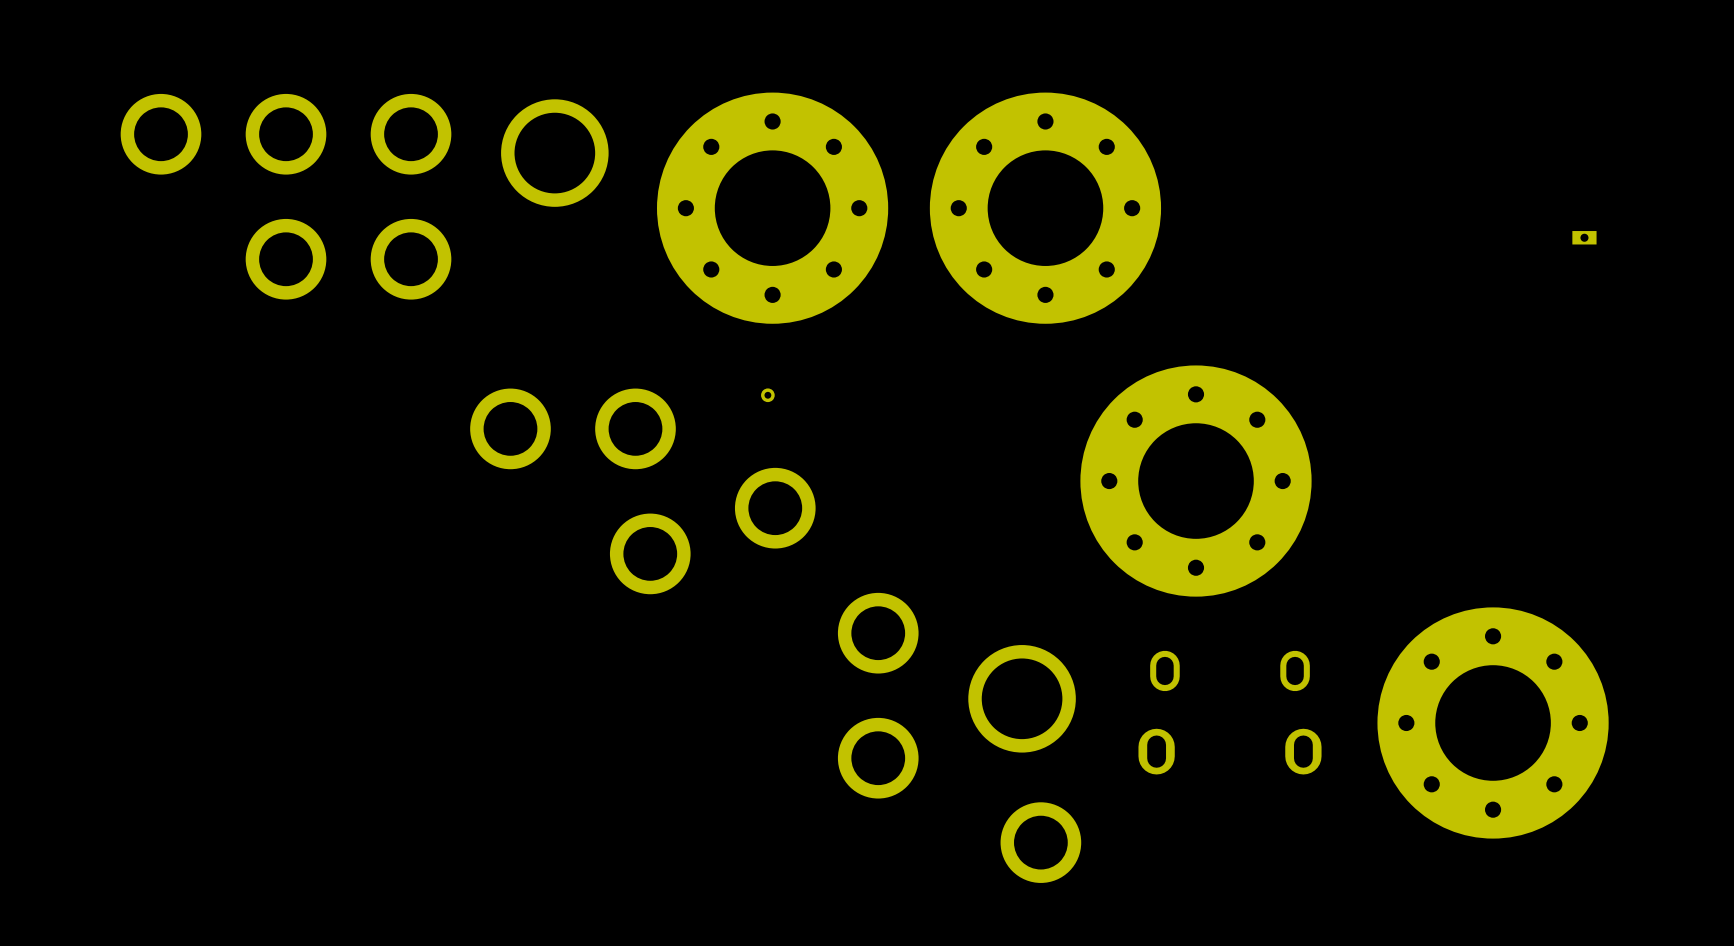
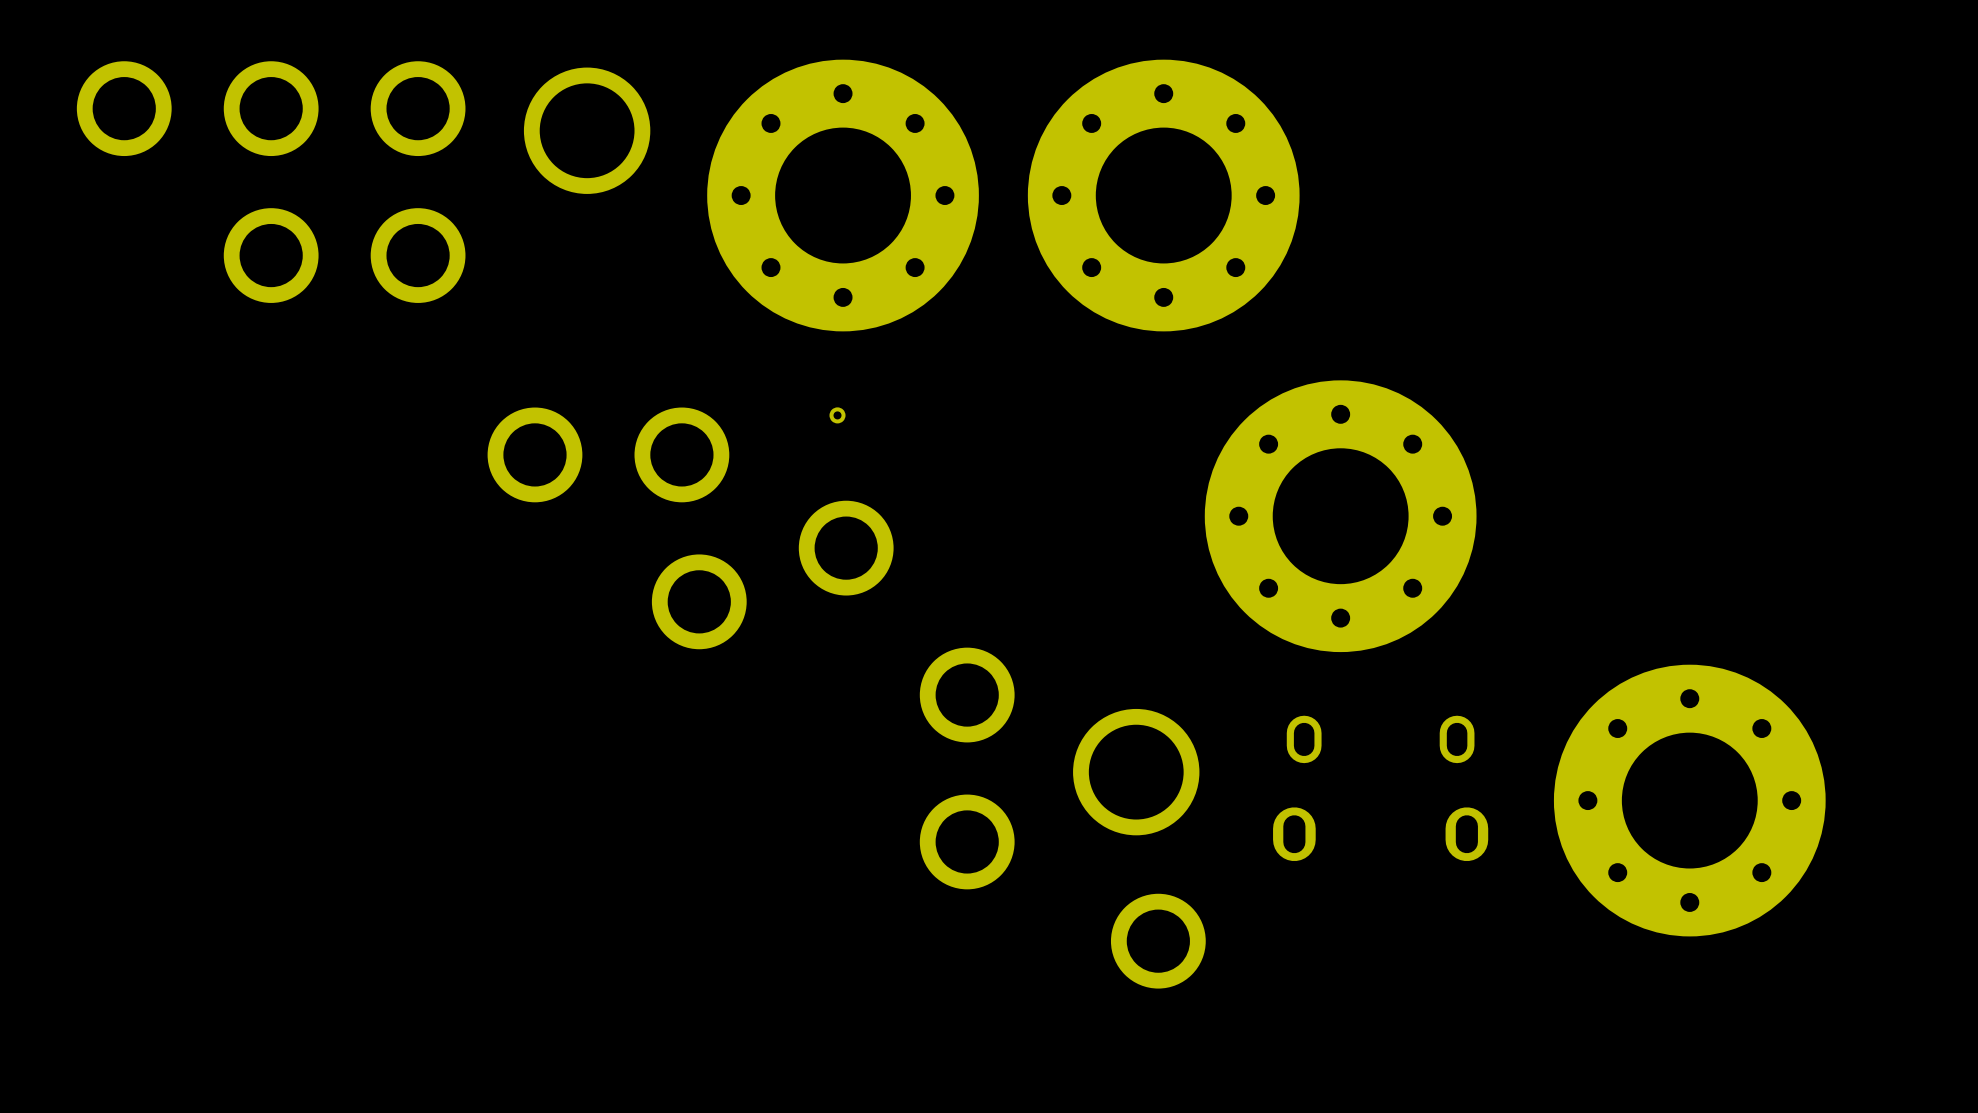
part: (1584, 237) -> none

